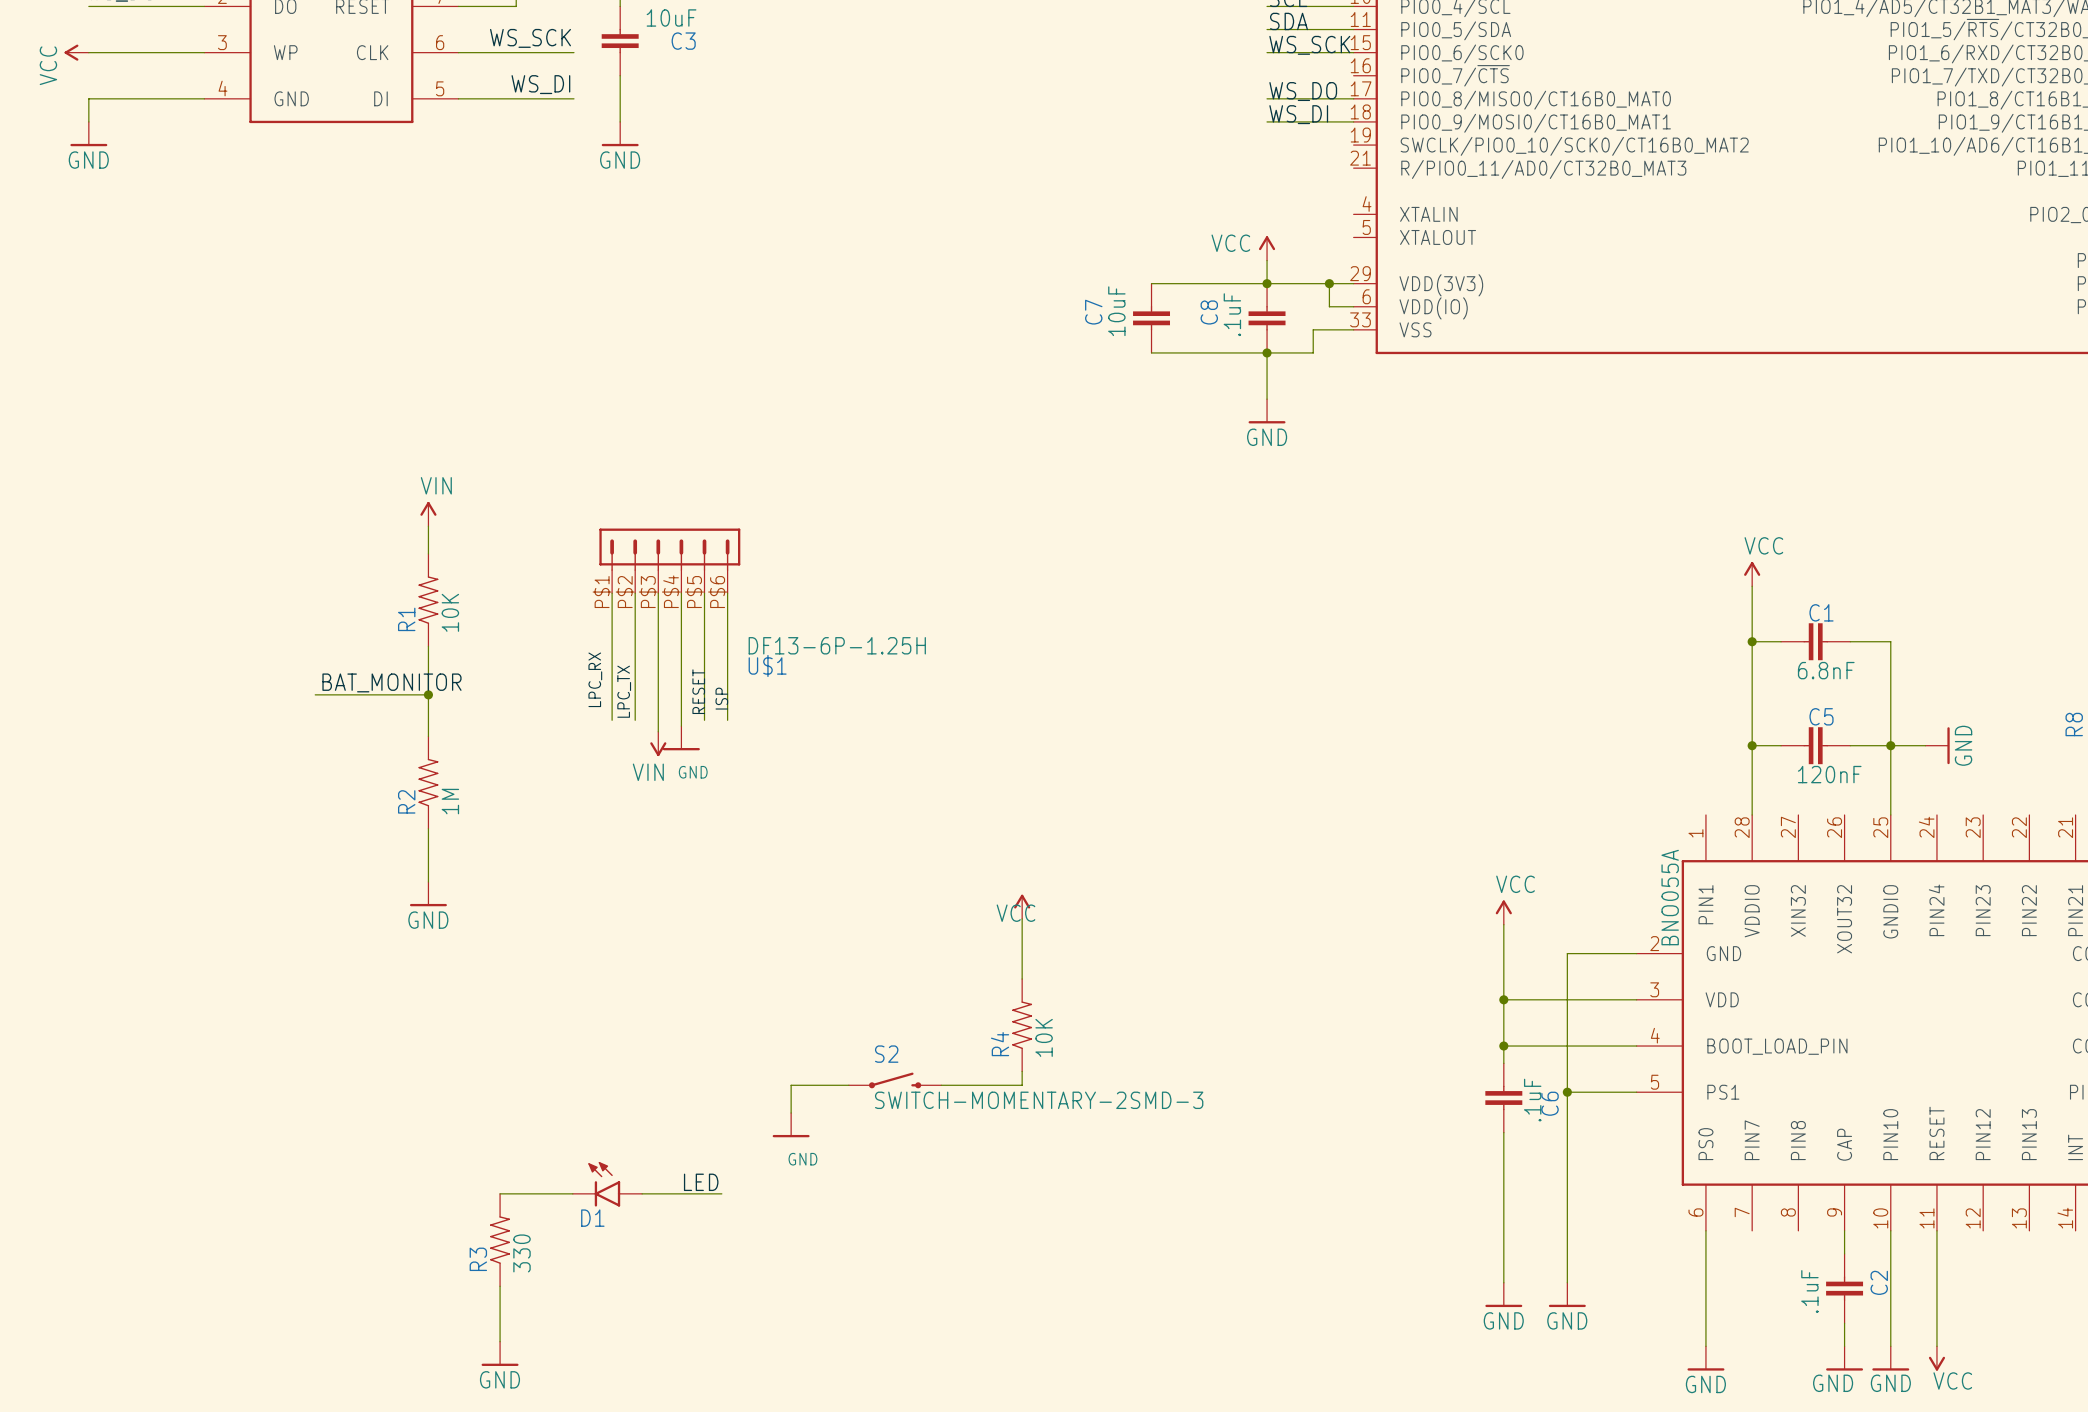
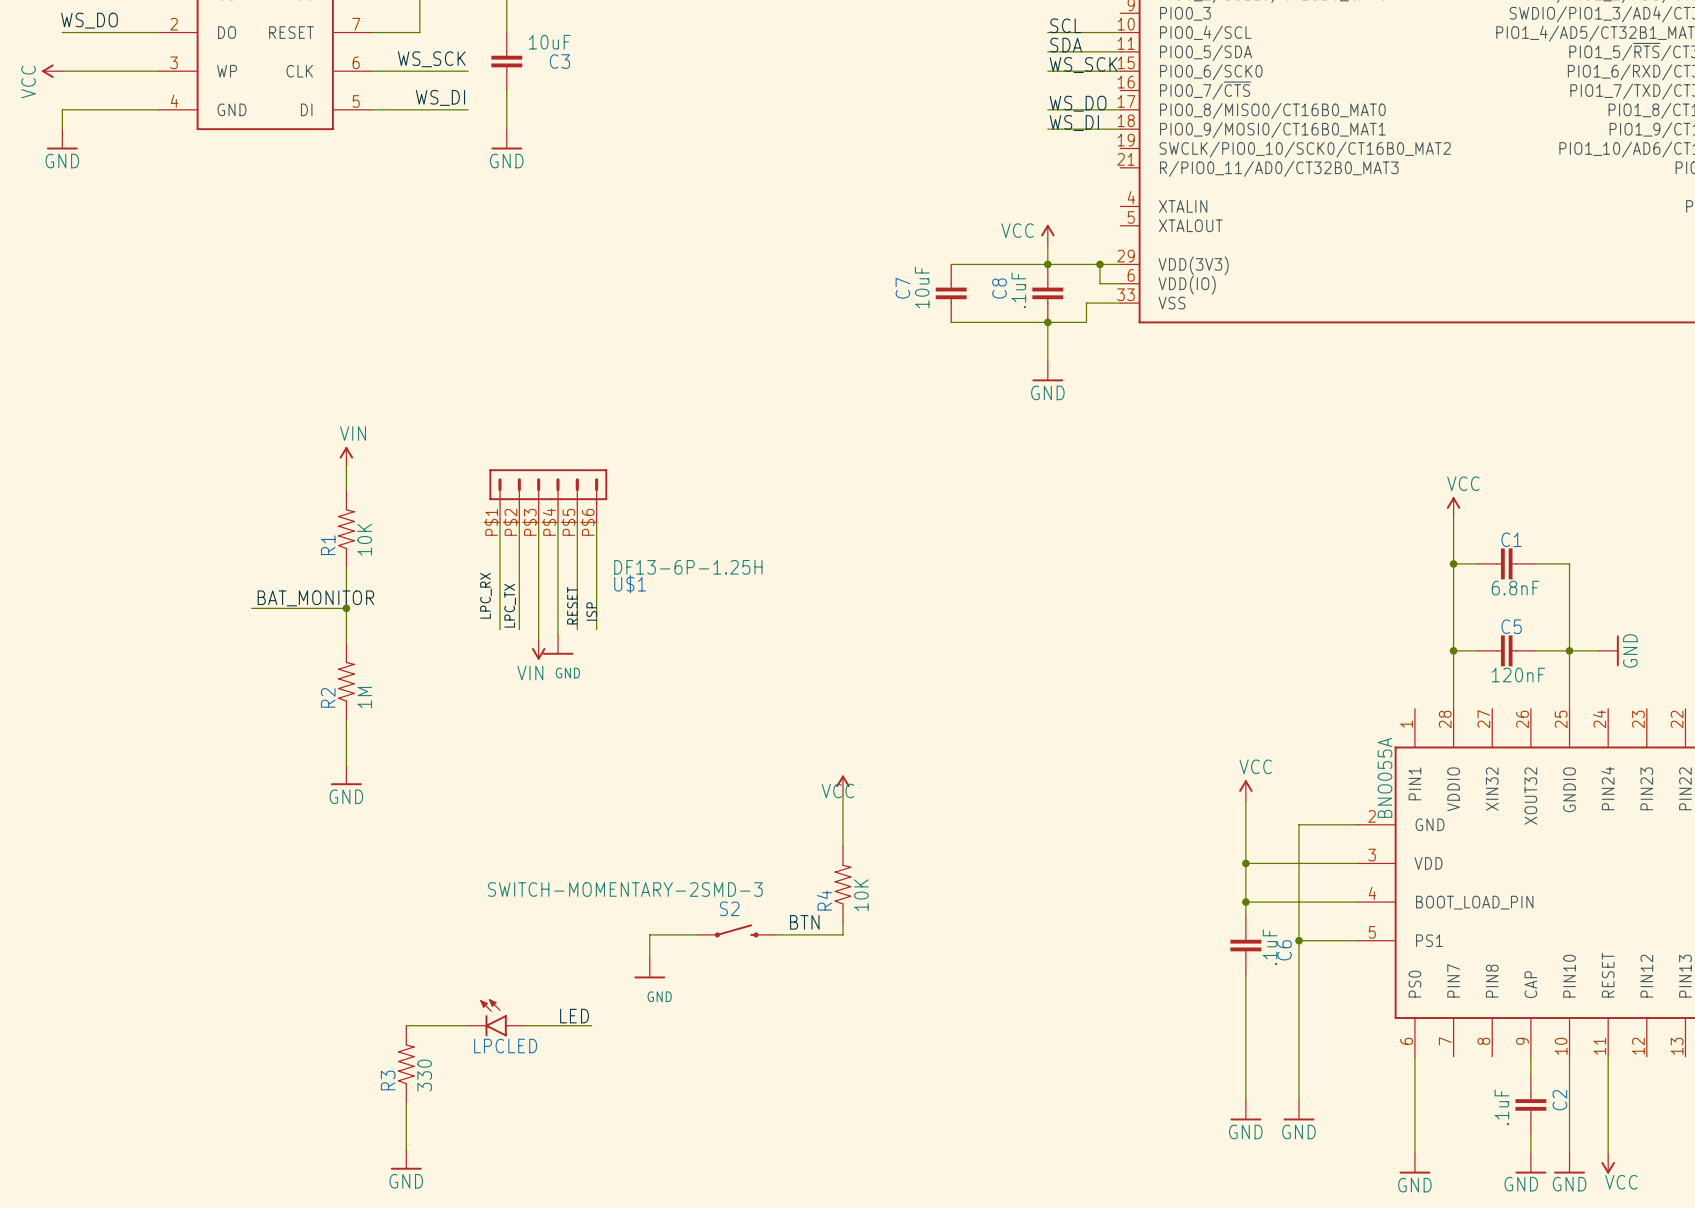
label: none -> BTN (804, 922)
S2 value position: SWITCH-MOMENTARY-2SMD-3 (1039, 1100) -> SWITCH-MOMENTARY-2SMD-3 (625, 889)
D1 name: D1 (592, 1218) -> LPCLED (505, 1046)

